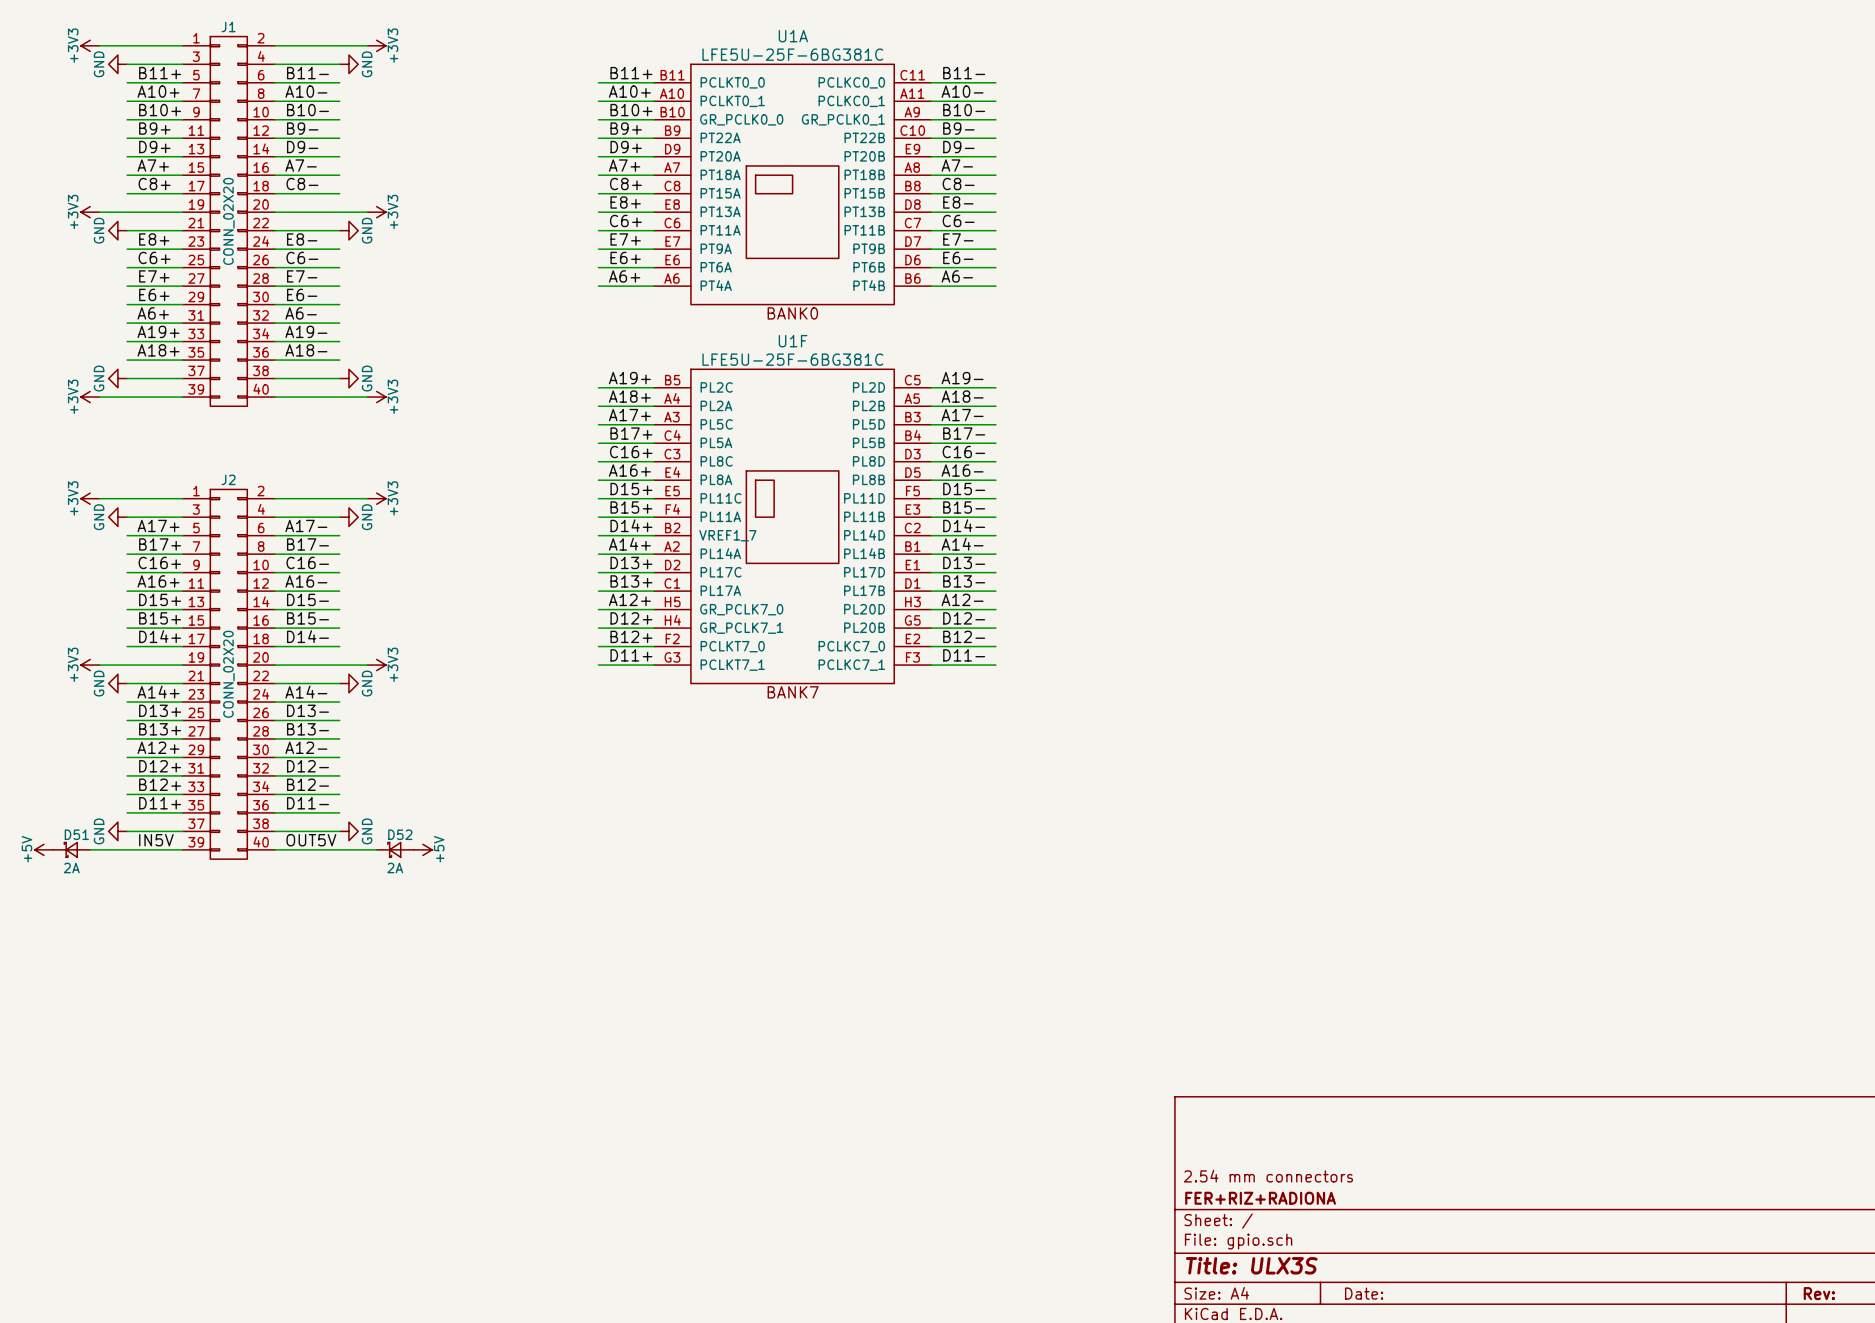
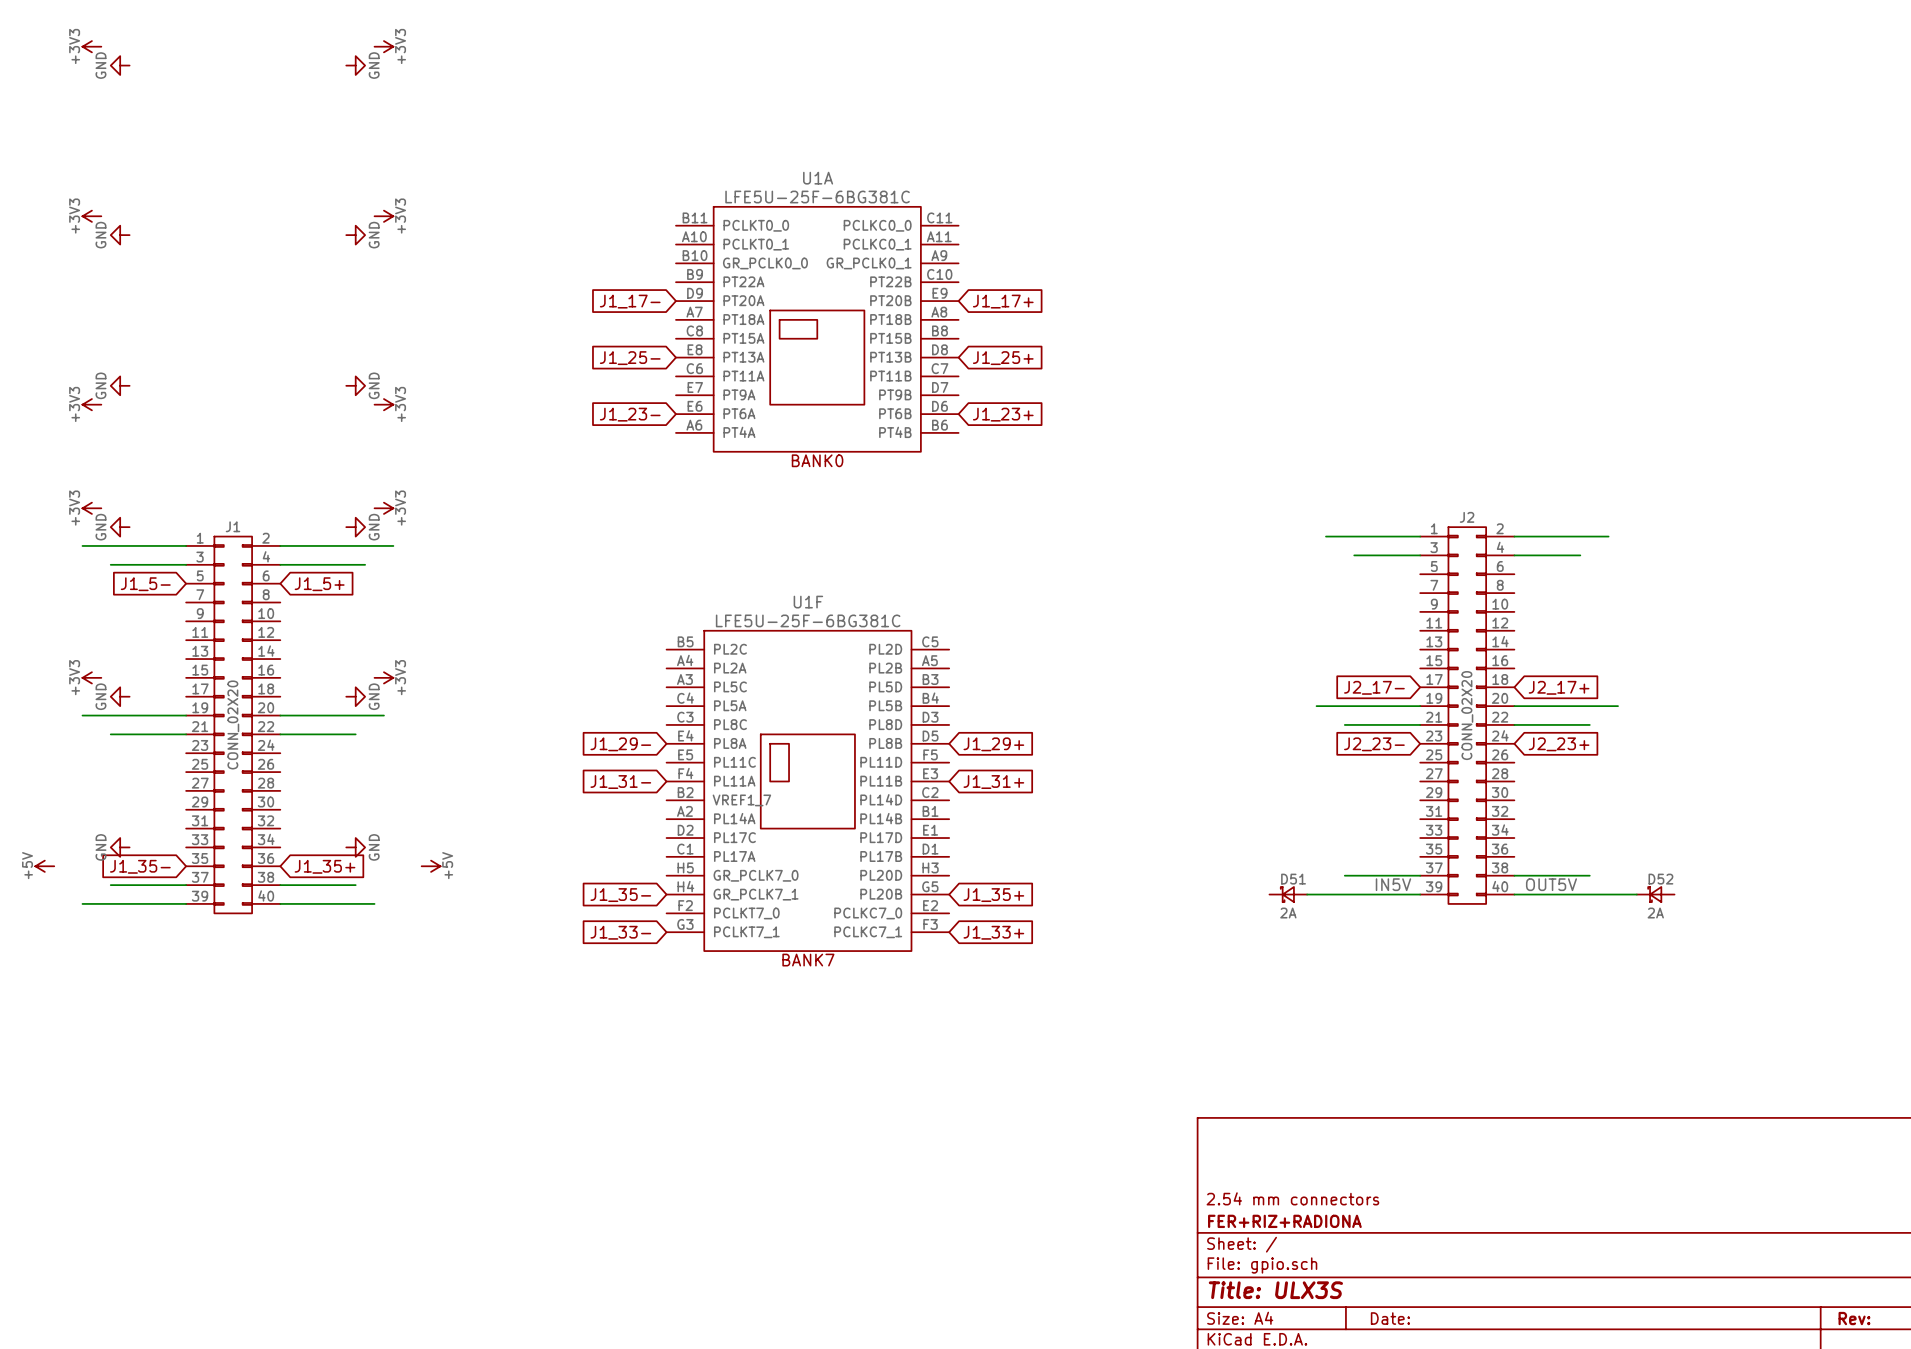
wire: (99, 45) (182, 45) -> none
wire: (275, 45) (367, 45) -> none
wire: (127, 64) (182, 64) -> none
wire: (275, 64) (339, 64) -> none
label: B11+ (160, 73) -> none
label: B11- (307, 73) -> none
label: B11+ (631, 73) -> none
label: B11- (964, 73) -> none
wire: (127, 82) (182, 82) -> none
wire: (275, 82) (339, 82) -> none
wire: (598, 82) (653, 82) -> none
wire: (931, 82) (995, 82) -> none
label: A10+ (158, 91) -> none
label: A10- (306, 91) -> none
label: A10+ (629, 91) -> none
label: A10- (962, 91) -> none
wire: (127, 101) (182, 101) -> none
wire: (275, 101) (339, 101) -> none
wire: (598, 101) (653, 101) -> none
wire: (931, 101) (995, 101) -> none
label: B10+ (160, 110) -> none
label: B10- (307, 110) -> none
label: B10+ (631, 110) -> none
label: B10- (964, 110) -> none
wire: (127, 119) (182, 119) -> none
wire: (275, 119) (339, 119) -> none
wire: (598, 119) (653, 119) -> none
wire: (931, 119) (995, 119) -> none
label: B9+ (154, 128) -> none
label: B9- (302, 128) -> none
label: B9+ (626, 128) -> none
label: B9- (958, 128) -> none
wire: (127, 138) (182, 138) -> none
wire: (275, 138) (339, 138) -> none
wire: (598, 138) (653, 138) -> none
wire: (931, 138) (995, 138) -> none
label: D9+ (154, 147) -> none
label: D9- (302, 147) -> none
label: D9+ (626, 147) -> none
label: D9- (958, 147) -> none
wire: (127, 156) (182, 156) -> none
wire: (275, 156) (339, 156) -> none
wire: (598, 156) (653, 156) -> none
wire: (931, 156) (995, 156) -> none
label: A7+ (153, 165) -> none
label: A7- (301, 165) -> none
label: A7+ (624, 165) -> none
label: A7- (957, 165) -> none
wire: (127, 175) (182, 175) -> none
wire: (275, 175) (339, 175) -> none
wire: (598, 175) (653, 175) -> none
wire: (931, 175) (995, 175) -> none
label: C8+ (154, 184) -> none
label: C8- (302, 184) -> none
label: C8+ (625, 184) -> none
U1A position: (792, 184) -> (817, 329)
label: C8- (958, 184) -> none
wire: (127, 193) (182, 193) -> none
wire: (275, 193) (339, 193) -> none
wire: (598, 193) (653, 193) -> none
wire: (931, 193) (995, 193) -> none
label: E8+ (625, 202) -> none
label: E8- (958, 202) -> none
wire: (99, 212) (182, 212) -> none
wire: (275, 212) (367, 212) -> none
wire: (598, 212) (653, 212) -> none
wire: (931, 212) (995, 212) -> none
label: C6+ (625, 220) -> none
label: C6- (958, 220) -> none
J1 position: (228, 221) -> (233, 724)
wire: (127, 230) (182, 230) -> none
wire: (275, 230) (339, 230) -> none
wire: (598, 230) (653, 230) -> none
wire: (931, 230) (995, 230) -> none
label: E8+ (154, 239) -> none
label: E8- (302, 239) -> none
label: E7+ (625, 239) -> none
label: E7- (958, 239) -> none
wire: (127, 249) (182, 249) -> none
wire: (275, 249) (339, 249) -> none
wire: (598, 249) (653, 249) -> none
wire: (931, 249) (995, 249) -> none
label: C6+ (154, 257) -> none
label: C6- (302, 257) -> none
label: E6+ (625, 257) -> none
label: E6- (958, 257) -> none
wire: (127, 267) (182, 267) -> none
wire: (275, 267) (339, 267) -> none
wire: (598, 267) (653, 267) -> none
wire: (931, 267) (995, 267) -> none
label: E7+ (154, 276) -> none
label: E7- (302, 276) -> none
label: A6+ (624, 276) -> none
label: A6- (957, 276) -> none
wire: (127, 286) (182, 286) -> none
wire: (275, 286) (339, 286) -> none
wire: (598, 286) (653, 286) -> none
wire: (931, 286) (995, 286) -> none
label: E6+ (154, 294) -> none
label: E6- (302, 294) -> none
global label: none -> J1_17- (630, 301)
global label: none -> J1_17+ (1003, 301)
wire: (127, 304) (182, 304) -> none
wire: (275, 304) (339, 304) -> none
label: A6+ (153, 313) -> none
label: A6- (301, 313) -> none
wire: (127, 323) (182, 323) -> none
wire: (275, 323) (339, 323) -> none
label: A19+ (158, 331) -> none
label: A19- (306, 331) -> none
wire: (127, 341) (182, 341) -> none
wire: (275, 341) (339, 341) -> none
label: A18+ (158, 350) -> none
label: A18- (306, 350) -> none
global label: none -> J1_25- (630, 358)
global label: none -> J1_25+ (1003, 358)
wire: (127, 360) (182, 360) -> none
wire: (275, 360) (339, 360) -> none
wire: (127, 378) (182, 378) -> none
wire: (275, 378) (339, 378) -> none
label: A19+ (629, 378) -> none
label: A19- (962, 378) -> none
wire: (598, 387) (653, 387) -> none
wire: (931, 387) (995, 387) -> none
label: A18+ (629, 396) -> none
label: A18- (962, 396) -> none
wire: (99, 397) (182, 397) -> none
wire: (275, 397) (367, 397) -> none
wire: (598, 406) (653, 406) -> none
global label: none -> J1_23- (630, 414)
wire: (931, 406) (995, 406) -> none
global label: none -> J1_23+ (1003, 414)
label: A17+ (629, 415) -> none
label: A17- (962, 415) -> none
wire: (598, 424) (653, 424) -> none
wire: (931, 424) (995, 424) -> none
label: B17+ (631, 433) -> none
label: B17- (964, 433) -> none
wire: (598, 443) (653, 443) -> none
wire: (931, 443) (995, 443) -> none
label: C16+ (631, 452) -> none
label: C16- (963, 452) -> none
wire: (598, 461) (653, 461) -> none
wire: (931, 461) (995, 461) -> none
label: A16+ (629, 470) -> none
label: A16- (962, 470) -> none
wire: (598, 480) (653, 480) -> none
wire: (931, 480) (995, 480) -> none
label: D15+ (631, 489) -> none
label: D15- (964, 489) -> none
wire: (99, 498) (182, 498) -> none
wire: (275, 498) (367, 498) -> none
wire: (598, 498) (653, 498) -> none
wire: (931, 498) (995, 498) -> none
label: B15+ (631, 507) -> none
label: B15- (964, 507) -> none
wire: (127, 517) (182, 517) -> none
wire: (275, 517) (339, 517) -> none
wire: (598, 517) (653, 517) -> none
wire: (931, 517) (995, 517) -> none
label: A17+ (158, 525) -> none
label: A17- (306, 525) -> none
label: D14+ (631, 525) -> none
label: D14- (964, 525) -> none
U1F position: (792, 526) -> (807, 790)
wire: none -> (1325, 536) (1420, 536)
wire: none -> (1514, 536) (1608, 536)
wire: none -> (82, 545) (129, 545)
wire: none -> (346, 545) (393, 545)
wire: (598, 535) (653, 535) -> none
wire: (931, 535) (995, 535) -> none
label: B17+ (160, 544) -> none
label: B17- (307, 544) -> none
label: A14+ (629, 544) -> none
label: A14- (962, 544) -> none
wire: none -> (1354, 555) (1420, 555)
wire: none -> (1514, 555) (1580, 555)
wire: none -> (110, 564) (129, 564)
wire: none -> (346, 564) (365, 564)
wire: (598, 554) (653, 554) -> none
wire: (931, 554) (995, 554) -> none
label: C16+ (159, 562) -> none
label: C16- (307, 562) -> none
label: D13+ (631, 562) -> none
label: D13- (964, 562) -> none
wire: (127, 572) (182, 572) -> none
wire: (275, 572) (339, 572) -> none
wire: (598, 572) (653, 572) -> none
wire: (931, 572) (995, 572) -> none
global label: none -> J1_5- (145, 584)
global label: none -> J1_5+ (319, 584)
label: A16+ (158, 581) -> none
label: A16- (306, 581) -> none
label: B13+ (631, 581) -> none
label: B13- (964, 581) -> none
wire: (127, 591) (182, 591) -> none
wire: (275, 591) (339, 591) -> none
wire: (598, 591) (653, 591) -> none
wire: (931, 591) (995, 591) -> none
label: D15+ (160, 599) -> none
label: D15- (307, 599) -> none
label: A12+ (629, 599) -> none
label: A12- (962, 599) -> none
wire: (127, 609) (182, 609) -> none
wire: (275, 609) (339, 609) -> none
wire: (598, 609) (653, 609) -> none
wire: (931, 609) (995, 609) -> none
label: B15+ (160, 618) -> none
label: B15- (307, 618) -> none
label: D12+ (631, 618) -> none
label: D12- (964, 618) -> none
wire: (127, 628) (182, 628) -> none
wire: (275, 628) (339, 628) -> none
wire: (598, 628) (653, 628) -> none
wire: (931, 628) (995, 628) -> none
label: D14+ (160, 636) -> none
label: D14- (307, 636) -> none
label: B12+ (631, 636) -> none
label: B12- (964, 636) -> none
wire: (127, 646) (182, 646) -> none
wire: (275, 646) (339, 646) -> none
wire: (598, 646) (653, 646) -> none
wire: (931, 646) (995, 646) -> none
label: D11+ (631, 655) -> none
label: D11- (964, 655) -> none
wire: (99, 665) (182, 665) -> none
wire: (275, 665) (367, 665) -> none
wire: (598, 665) (653, 665) -> none
wire: (931, 665) (995, 665) -> none
J2 position: (228, 674) -> (1467, 715)
global label: none -> J2_17- (1374, 687)
global label: none -> J2_17+ (1559, 687)
wire: (127, 683) (182, 683) -> none
wire: (275, 683) (339, 683) -> none
label: A14+ (158, 692) -> none
label: A14- (306, 692) -> none
wire: none -> (1316, 706) (1420, 706)
wire: none -> (1514, 706) (1618, 706)
wire: none -> (82, 715) (129, 715)
wire: none -> (346, 715) (383, 715)
label: D13+ (160, 710) -> none
label: D13- (307, 710) -> none
wire: none -> (1344, 724) (1420, 724)
wire: none -> (1514, 724) (1589, 724)
wire: none -> (110, 734) (129, 734)
wire: none -> (346, 734) (355, 734)
label: B13+ (160, 729) -> none
label: B13- (307, 729) -> none
global label: none -> J1_29- (620, 744)
global label: none -> J1_29+ (993, 744)
global label: none -> J2_23- (1374, 744)
global label: none -> J2_23+ (1559, 744)
wire: (127, 738) (182, 738) -> none
wire: (275, 738) (339, 738) -> none
label: A12+ (158, 747) -> none
label: A12- (306, 747) -> none
wire: (127, 757) (182, 757) -> none
wire: (275, 757) (339, 757) -> none
label: D12+ (160, 766) -> none
label: D12- (307, 766) -> none
global label: none -> J1_31- (620, 782)
global label: none -> J1_31+ (993, 782)
wire: (127, 775) (182, 775) -> none
wire: (275, 775) (339, 775) -> none
label: B12+ (160, 784) -> none
label: B12- (307, 784) -> none
wire: (127, 794) (182, 794) -> none
wire: (275, 794) (339, 794) -> none
label: D11+ (160, 803) -> none
label: D11- (307, 803) -> none
wire: (127, 812) (182, 812) -> none
wire: (275, 812) (339, 812) -> none
wire: (127, 831) (182, 831) -> none
wire: (275, 831) (339, 831) -> none
label: IN5V (156, 840) -> none
label: OUT5V (311, 840) -> none
D51 position: (71, 849) -> (1288, 894)
wire: (90, 849) (182, 849) -> none
wire: (275, 849) (376, 849) -> none
D52 position: (395, 849) -> (1655, 894)
global label: none -> J1_35- (140, 866)
global label: none -> J1_35+ (325, 866)
wire: none -> (1344, 875) (1420, 875)
wire: none -> (1514, 875) (1589, 875)
label: none -> IN5V (1393, 884)
label: none -> OUT5V (1551, 884)
wire: none -> (110, 885) (186, 885)
wire: none -> (280, 885) (355, 885)
wire: none -> (1307, 894) (1420, 894)
wire: none -> (1514, 894) (1636, 894)
global label: none -> J1_35- (620, 895)
global label: none -> J1_35+ (993, 895)
wire: none -> (82, 903) (186, 903)
wire: none -> (280, 903) (374, 903)
global label: none -> J1_33- (620, 932)
global label: none -> J1_33+ (993, 932)

